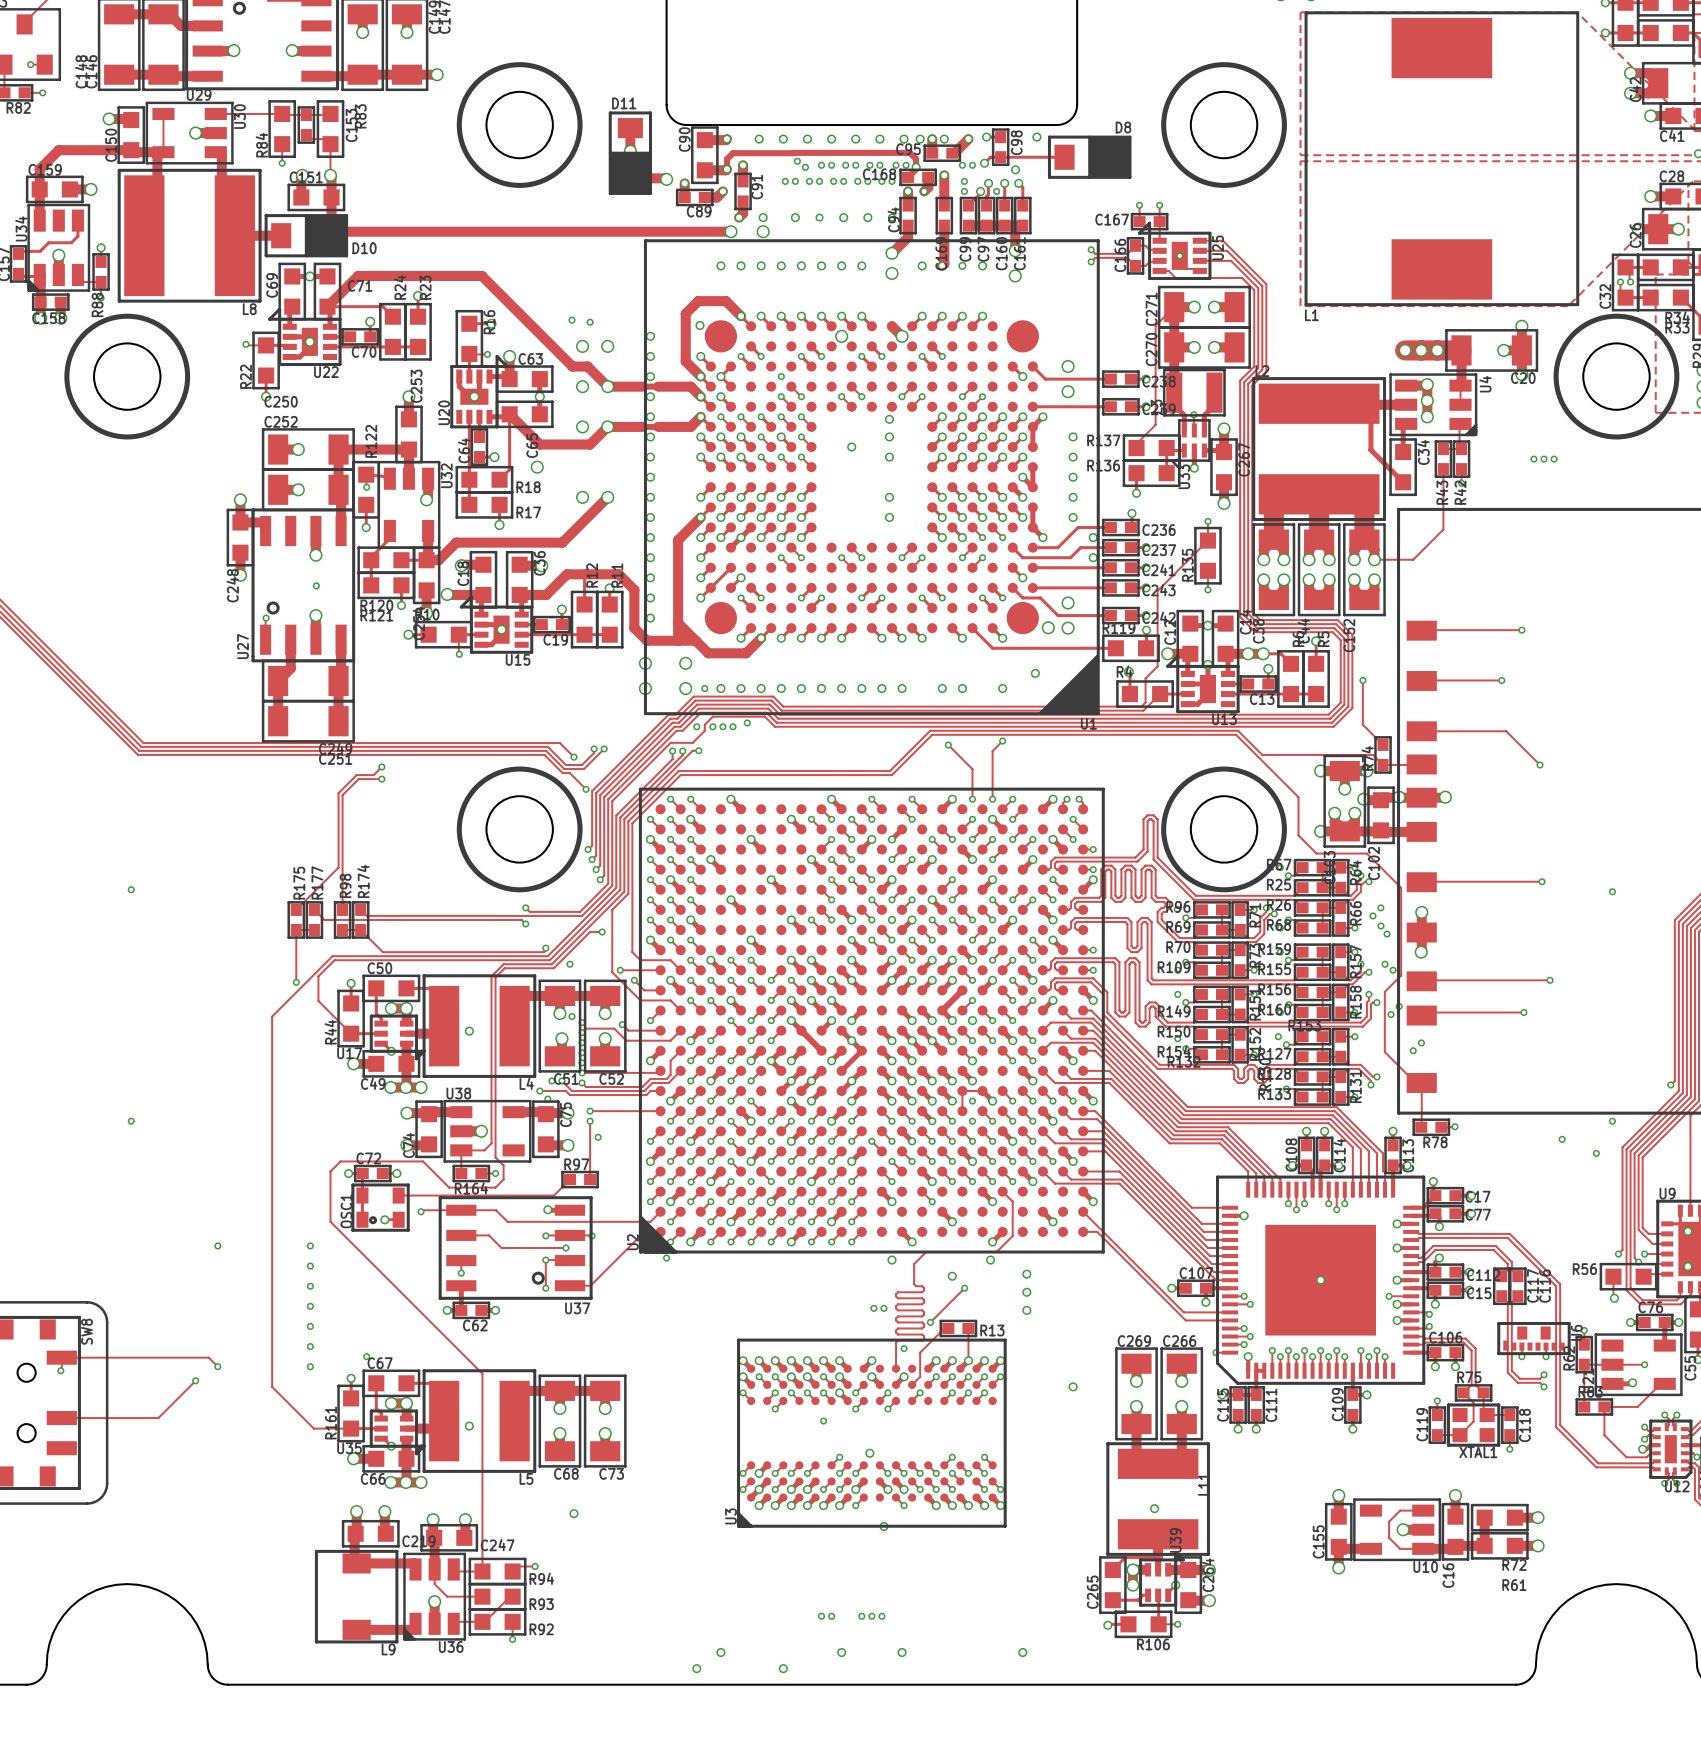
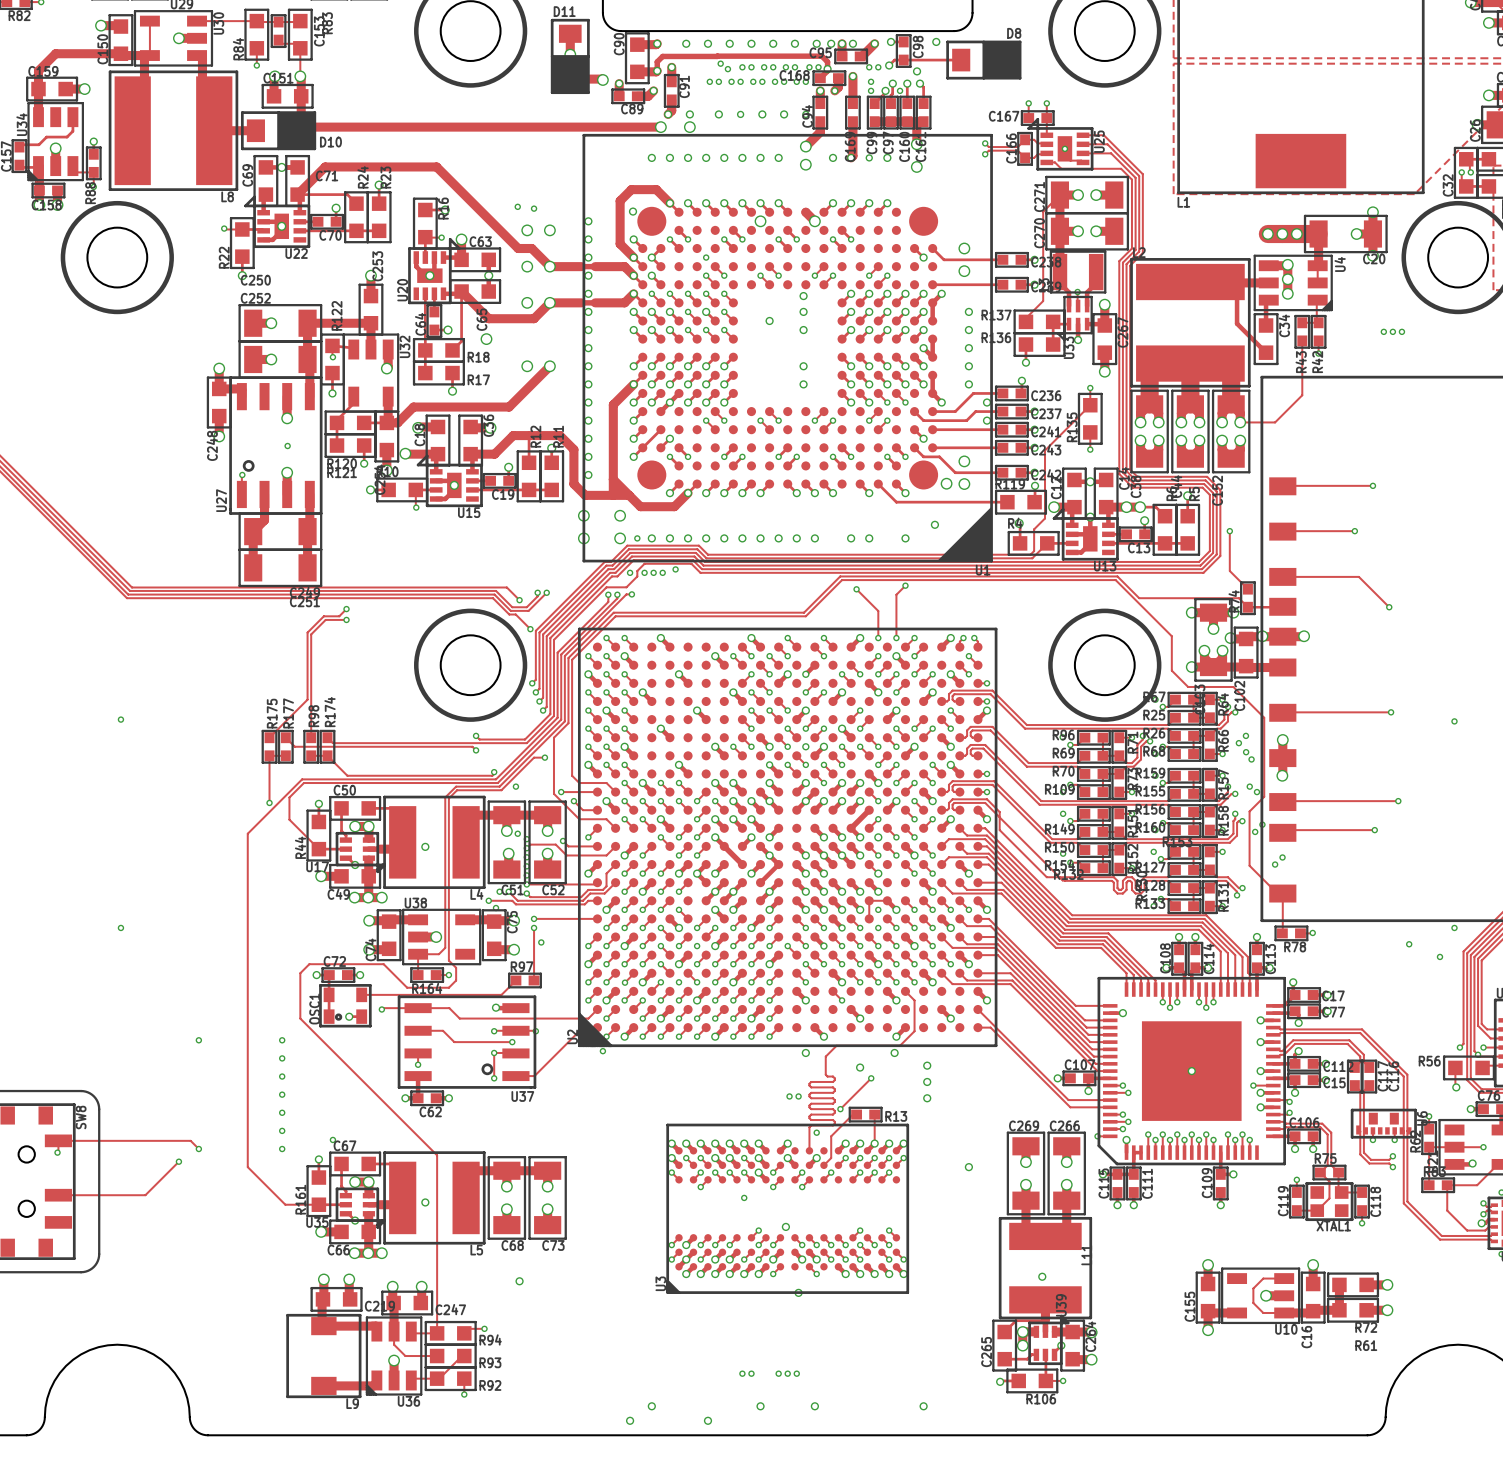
track: (1099, 857) (1135, 857) (1143, 849) (1143, 819) (1147, 815) (1153, 815) (1157, 819) (1157, 857) (1195, 895) -> (992, 690) (1026, 725) (1079, 725)
track: (1097, 861) (1137, 861) (1147, 851) (1147, 821) (1151, 819) (1153, 821) (1153, 859) (1193, 899) -> (990, 694) (1025, 728) (1077, 728)
track: (1099, 897) (1101, 895) (1101, 869) (1105, 865) (1111, 865) (1115, 869) (1115, 895) (1117, 897) (1121, 895) (1121, 869) (1125, 865) (1131, 865) (1135, 869) (1135, 895) (1137, 897) (1141, 895) (1141, 869) (1145, 865) (1151, 865) (1155, 869) (1155, 895) (1157, 897) (1165, 897) (1169, 901) (1169, 907) (1161, 913) (1161, 919) (1179, 938) -> (992, 726) (1028, 763) (1064, 763)
track: (1097, 901) (1101, 901) (1105, 897) (1105, 871) (1107, 869) (1111, 871) (1111, 897) (1115, 901) (1121, 901) (1125, 897) (1125, 871) (1127, 869) (1131, 871) (1131, 897) (1135, 901) (1141, 901) (1145, 897) (1145, 871) (1149, 869) (1151, 871) (1151, 897) (1155, 901) (1163, 901) (1165, 903) (1157, 911) (1157, 921) (1177, 942) -> (990, 730) (1026, 766) (1063, 766)
track: (1091, 917) (1127, 917) (1131, 921) (1131, 946) (1133, 948) (1137, 946) (1137, 921) (1141, 917) (1147, 917) (1151, 921) (1151, 978) -> (985, 744) (1039, 799)
track: (1089, 921) (1125, 921) (1127, 923) (1127, 948) (1131, 952) (1137, 952) (1141, 948) (1141, 923) (1143, 921) (1147, 923) (1147, 980) -> (983, 748) (1035, 801)
track: (1101, 958) (1115, 958) (1119, 962) (1119, 1010) -> (996, 813) (1010, 828)
track: (1099, 962) (1113, 962) (1115, 964) (1115, 1012) (1119, 1016) (1125, 1016) (1129, 1012) (1129, 964) (1133, 962) (1135, 964) (1135, 1022) (1139, 1026) (1145, 1026) (1149, 1022) (1149, 1008) (1153, 1006) (1155, 1008) (1155, 1016) (1165, 1026) -> (992, 784) (1052, 842)
track: (1103, 994) (1103, 1014) (1157, 1068) (1179, 1068) -> (1012, 830) (1064, 880)
track: (1121, 1012) (1125, 1010) (1125, 962) (1129, 958) (1135, 958) (1139, 962) (1139, 1020) (1141, 1022) (1145, 1020) (1145, 1006) (1149, 1002) (1155, 1002) (1159, 1006) (1159, 1014) (1167, 1022) -> (994, 781) (1054, 839)

